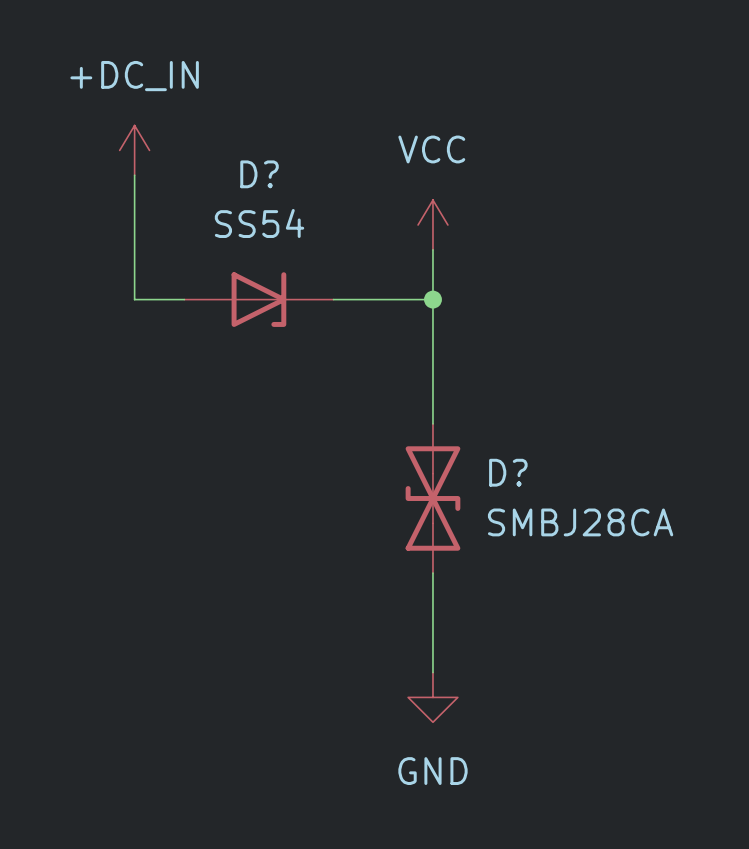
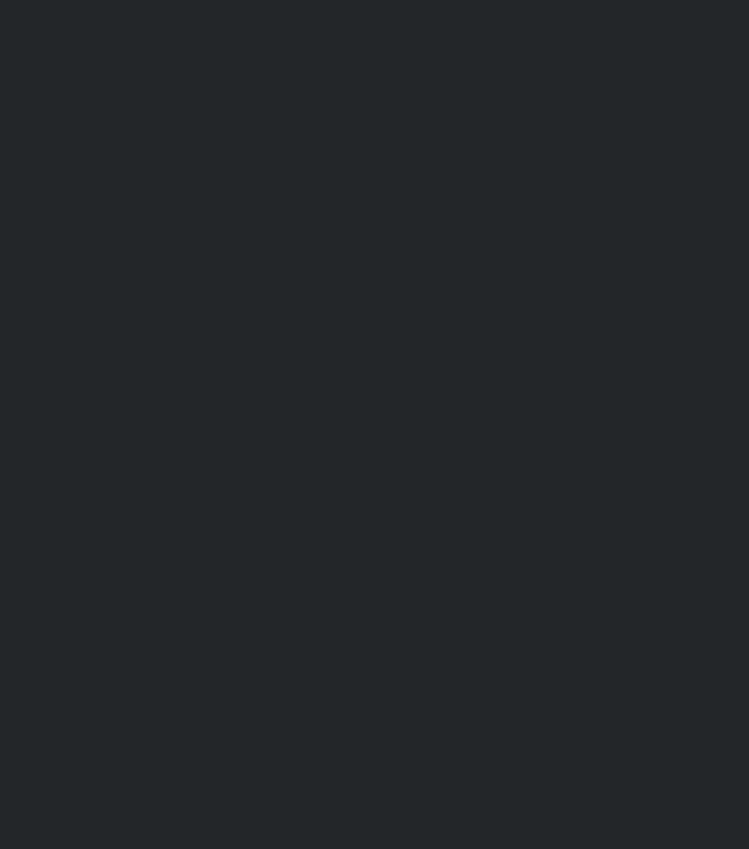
power symbol: +DC_IN (134, 150) -> none
wire: (134, 175) (134, 299) (184, 299) -> none
power symbol: VCC (432, 225) -> none
wire: (432, 249) (432, 423) -> none
D?: SS54 (258, 299) -> none
wire: (333, 299) (432, 299) -> none
junction: (432, 299) -> none
D?: SMBJ28CA (432, 498) -> none
wire: (432, 573) (432, 672) -> none
power symbol: GND (432, 697) -> none

